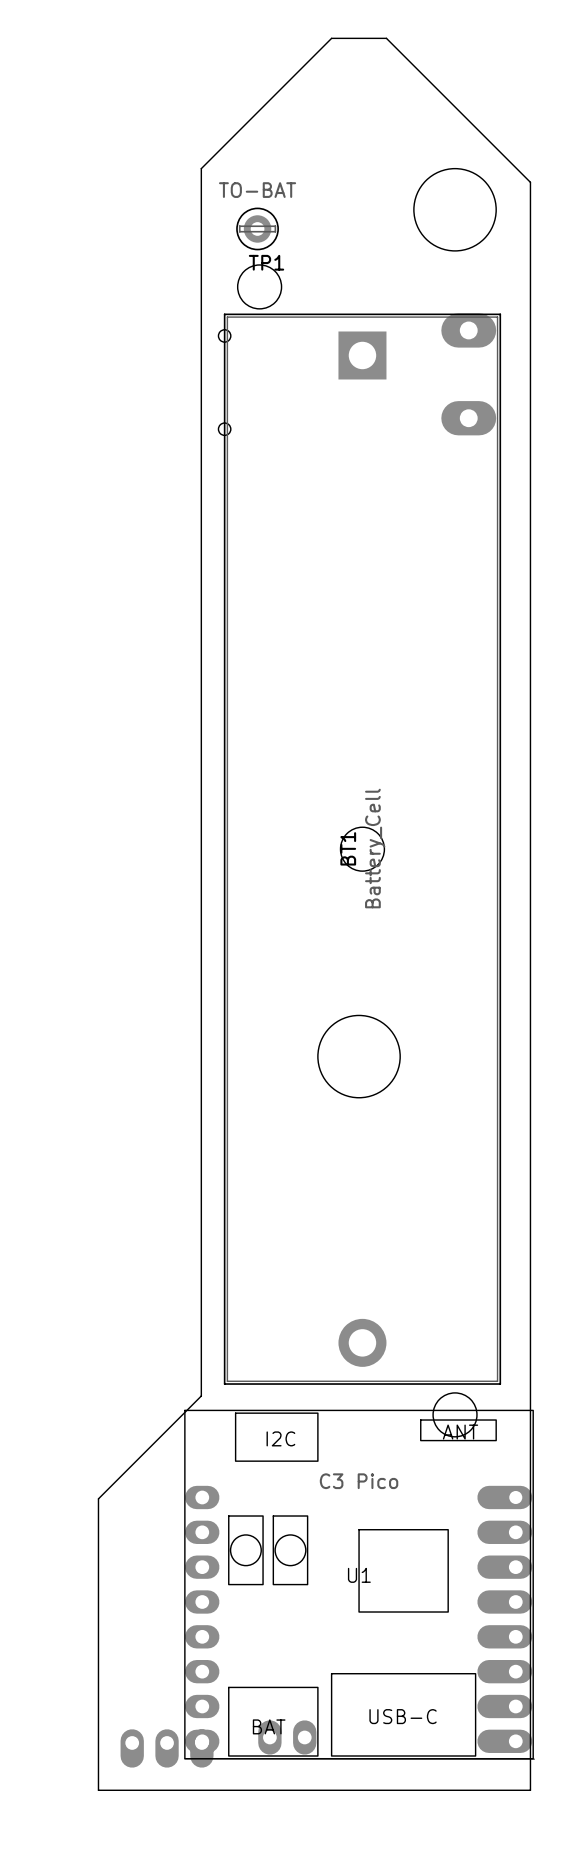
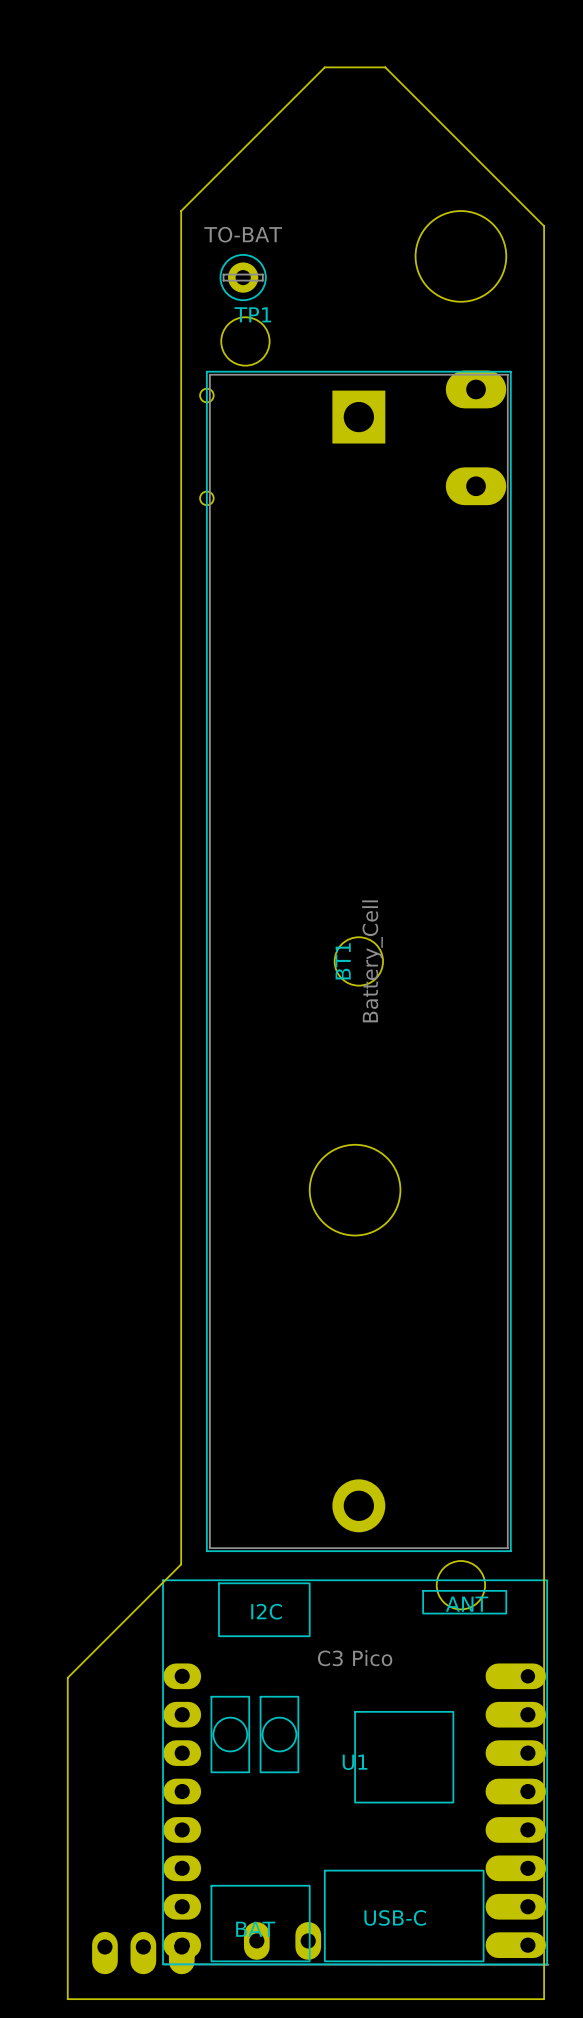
part footprint: [258, 1720, 317, 1755] -> [243, 1922, 322, 1960]

